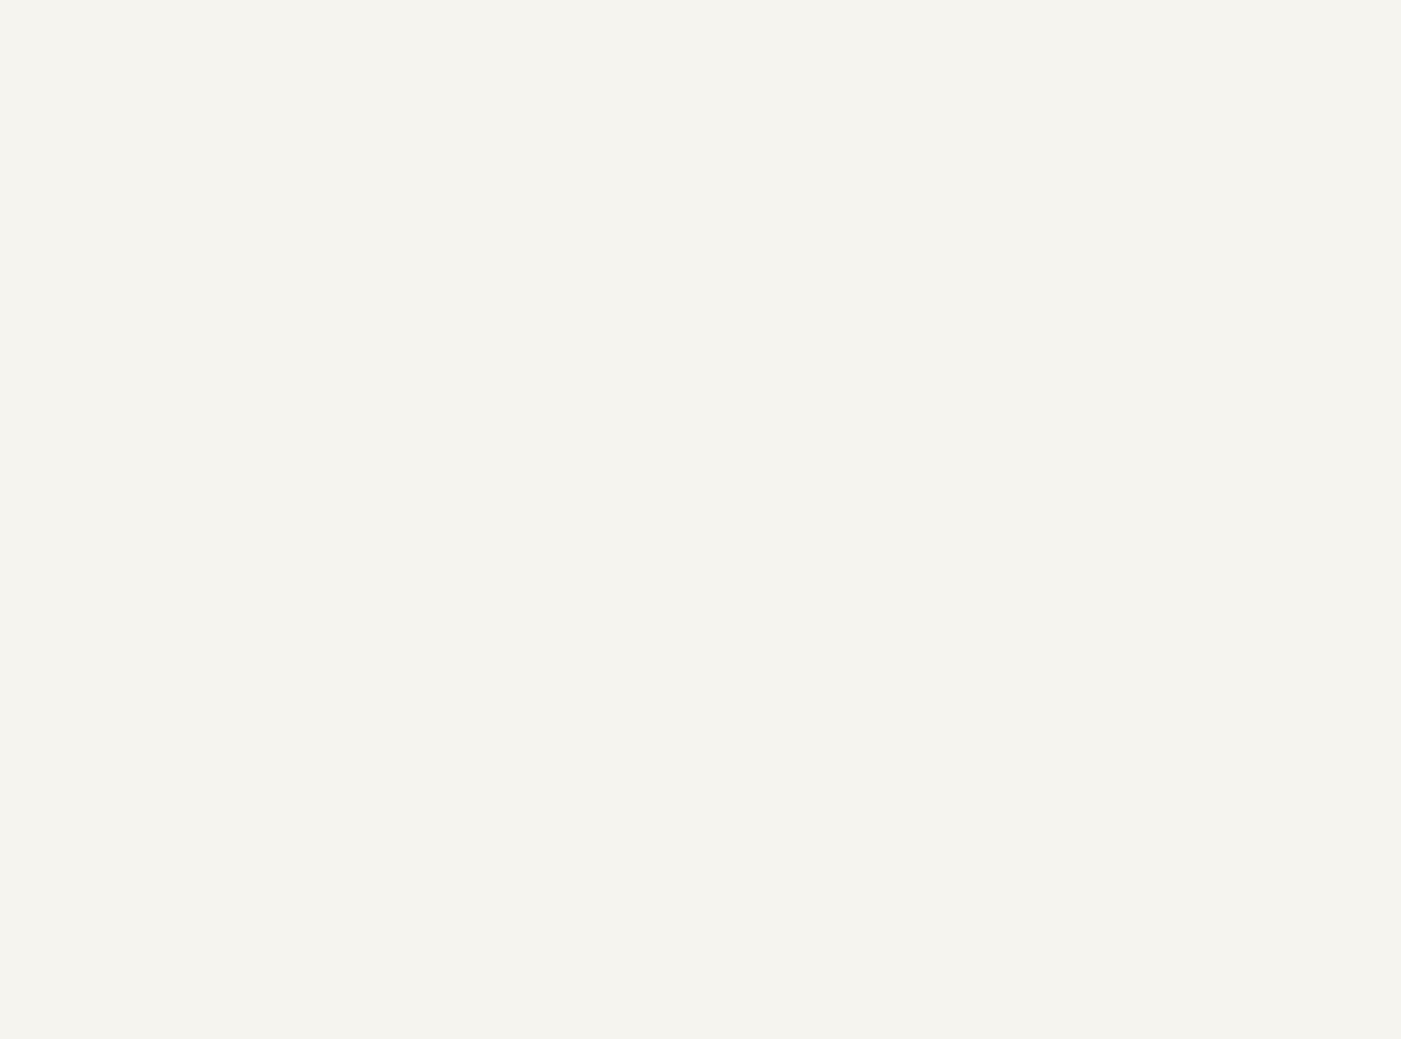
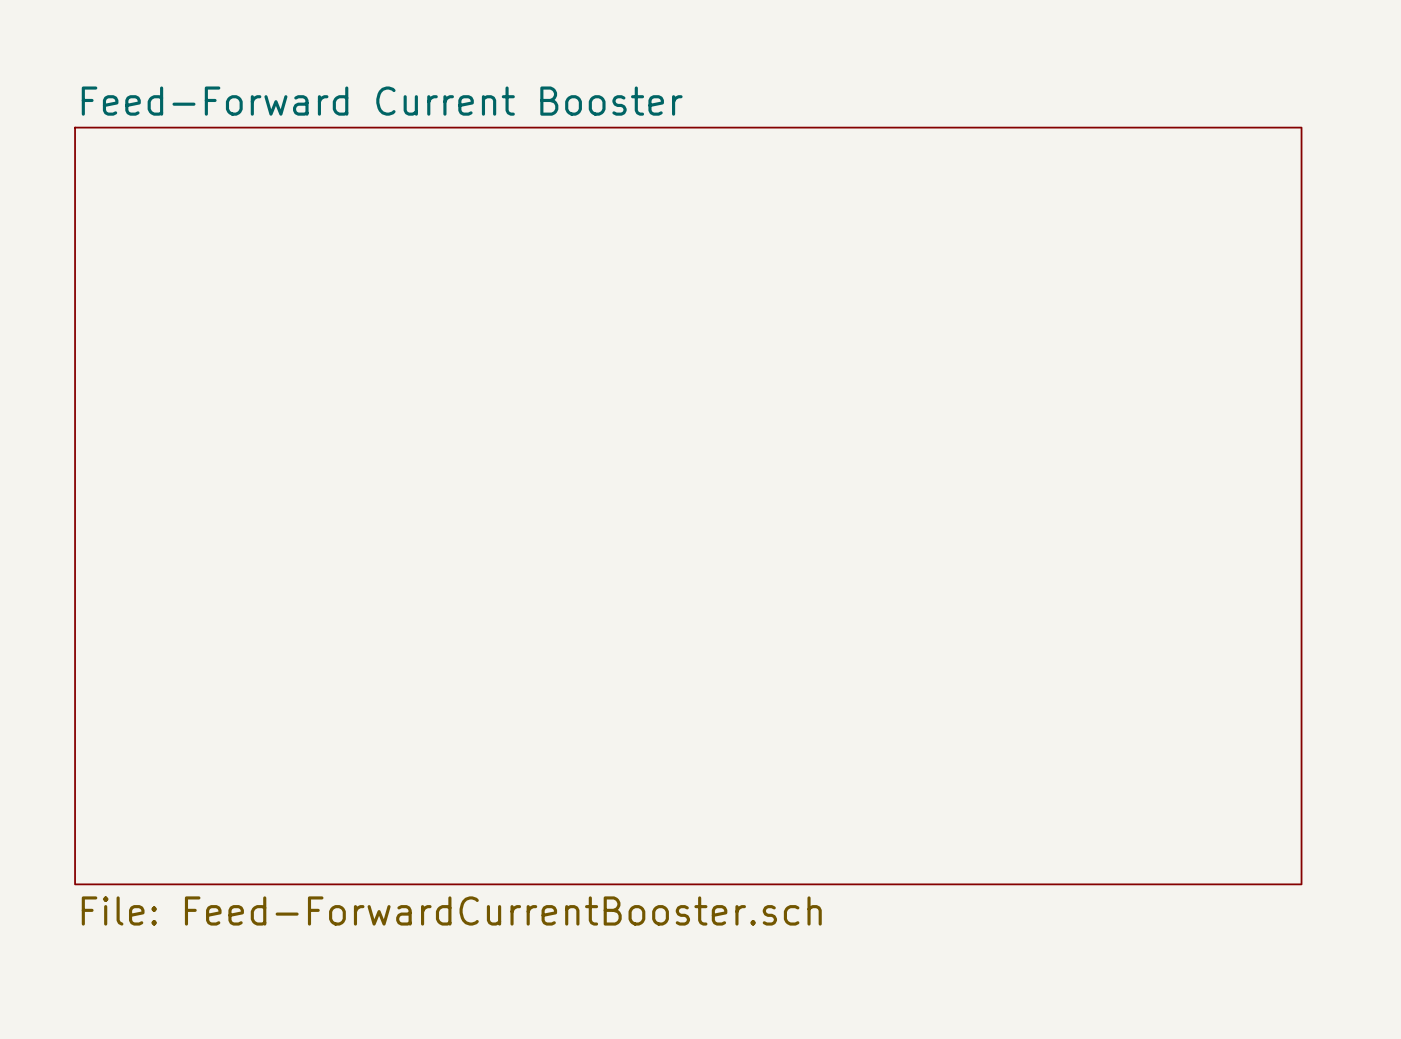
sheet Feed-Forward Current Booster: none -> File: Feed-ForwardCurrentBooster.sch (688, 505)

